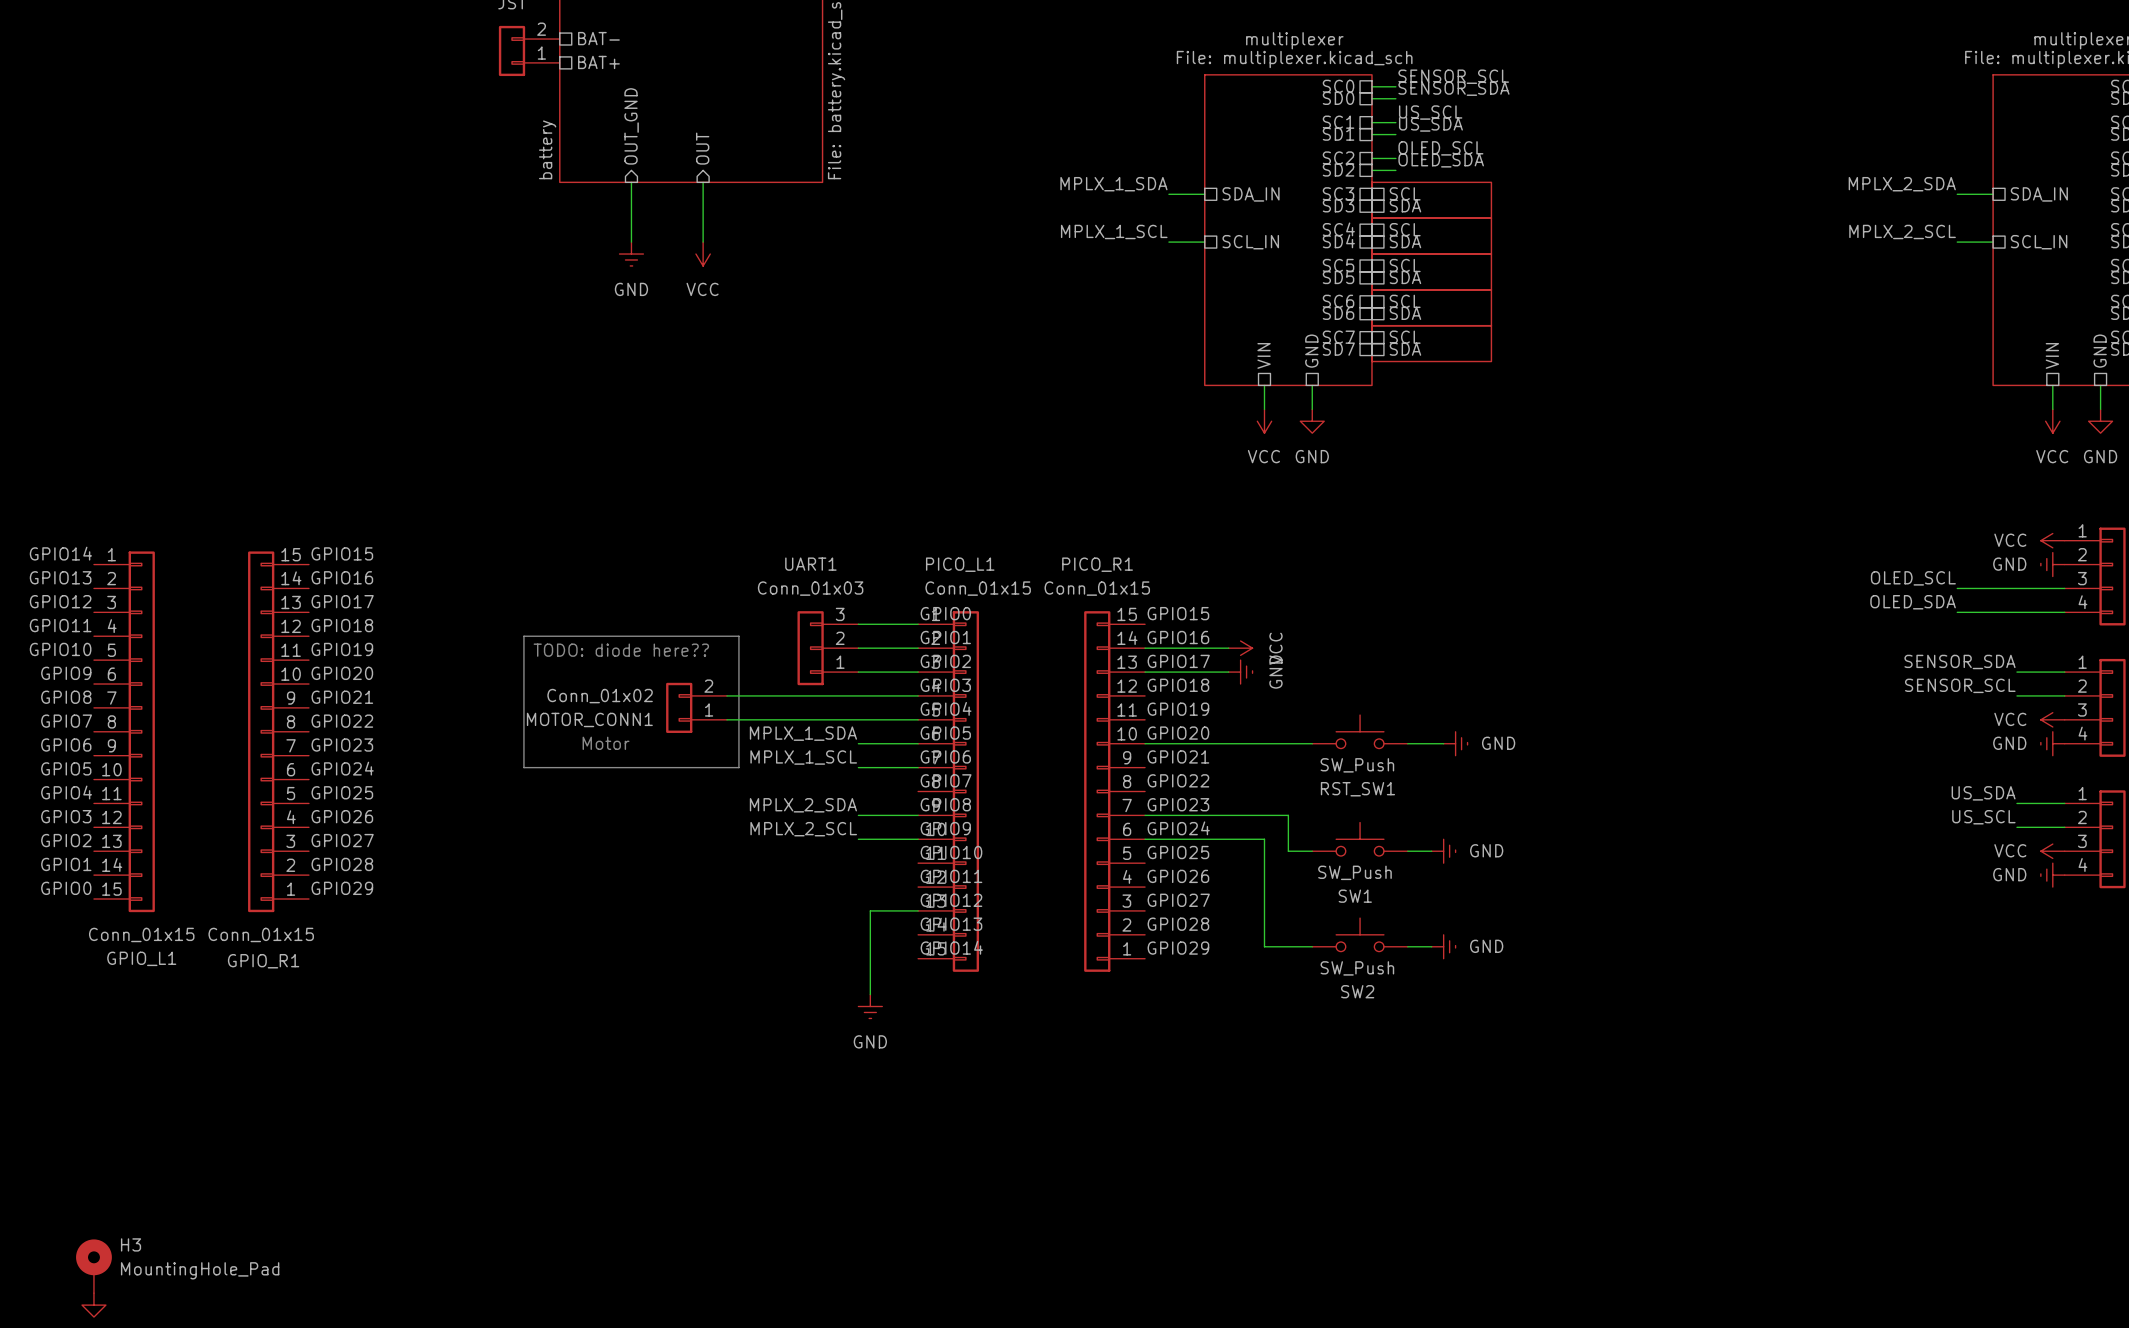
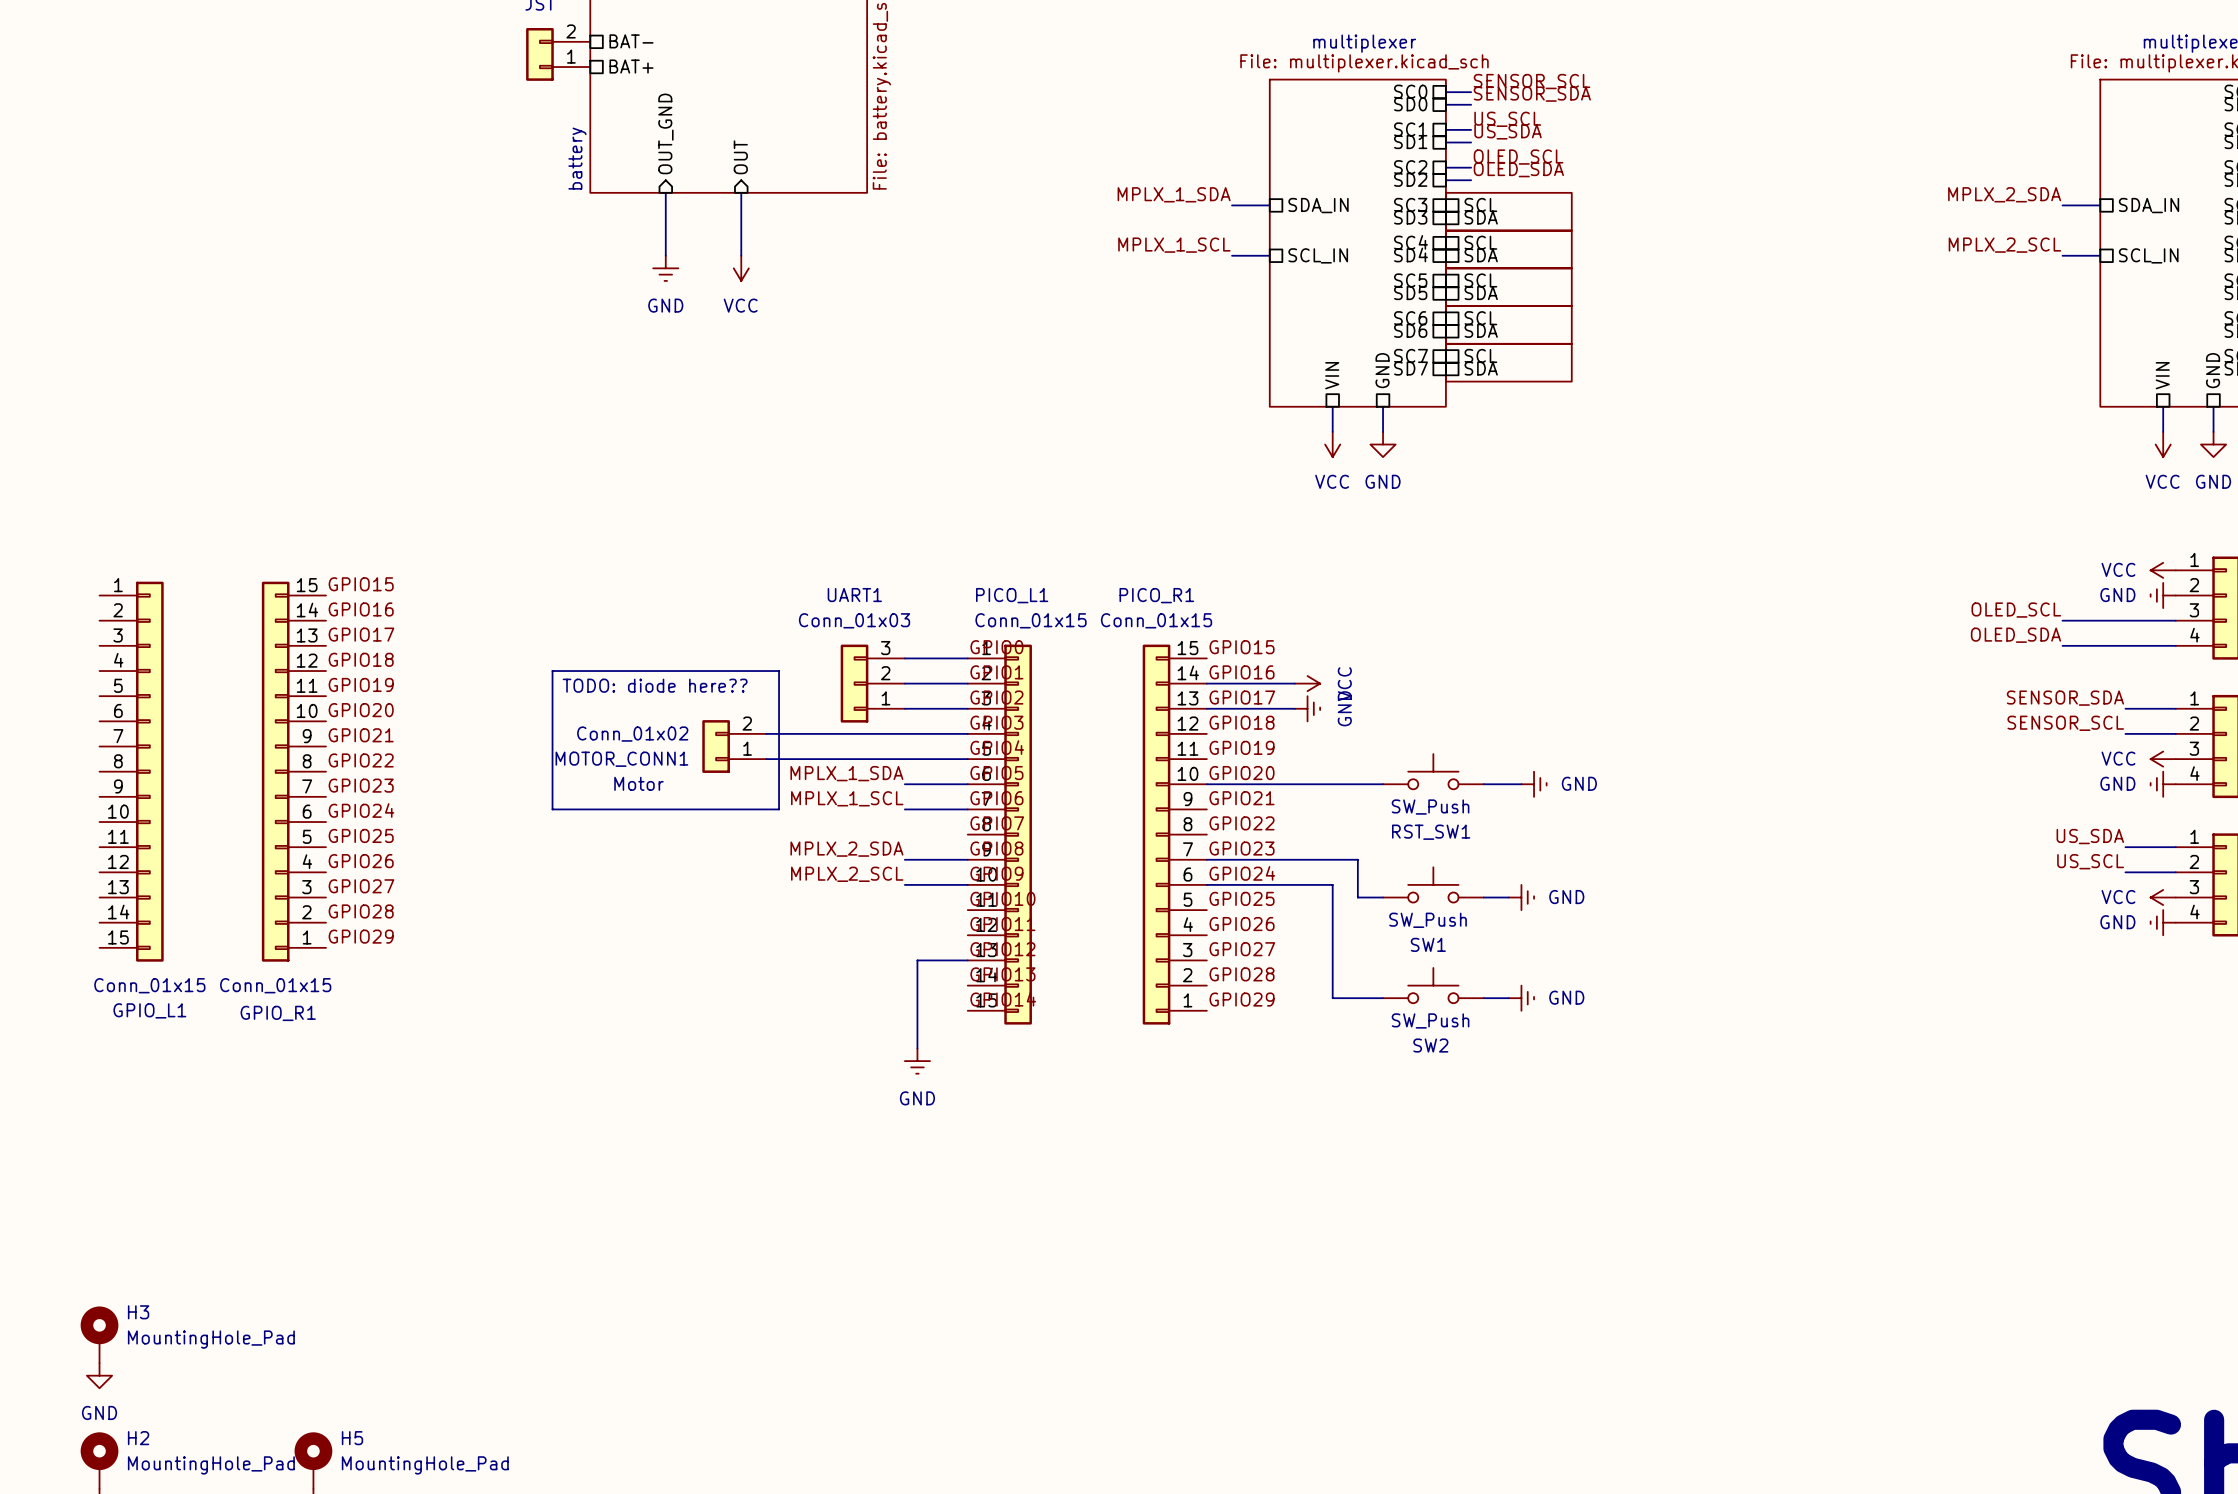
label: GPIO14 (60, 553) -> none
label: GPIO13 (60, 577) -> none
label: GPIO12 (60, 601) -> none
label: GPIO11 (60, 625) -> none
label: GPIO10 (60, 649) -> none
label: GPIO9 (66, 673) -> none
label: GPIO8 (66, 697) -> none
label: GPIO7 (66, 721) -> none
label: GPIO6 (66, 745) -> none
label: GPIO5 (66, 768) -> none
label: GPIO4 (66, 792) -> none
label: GPIO3 (66, 816) -> none
label: GPIO2 (66, 840) -> none
label: GPIO1 (66, 864) -> none
label: GPIO0 (66, 888) -> none

